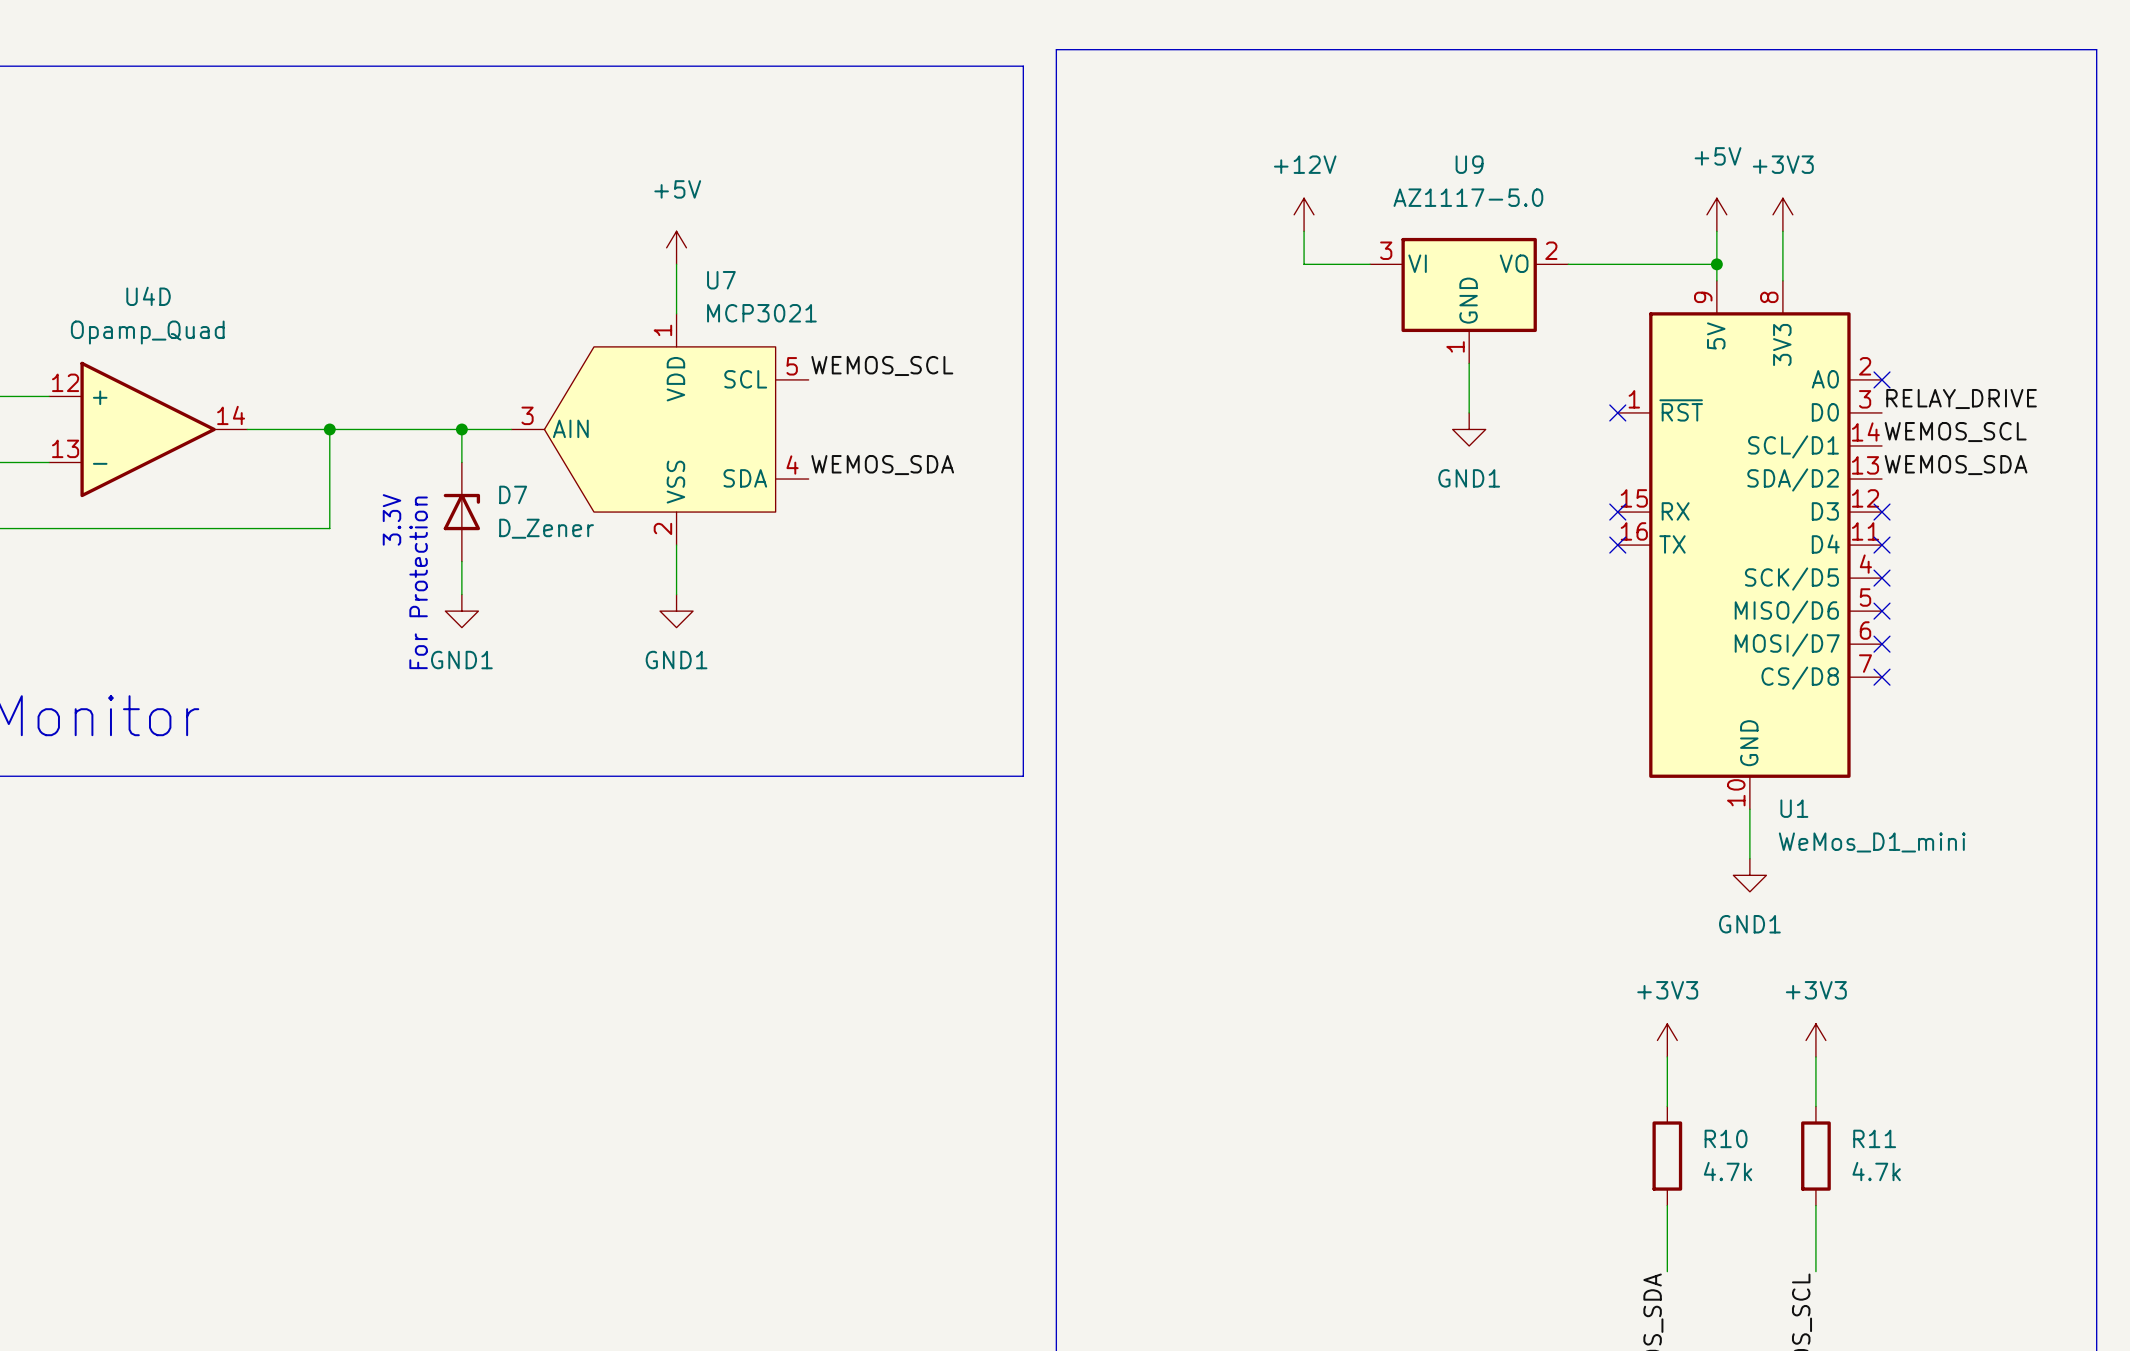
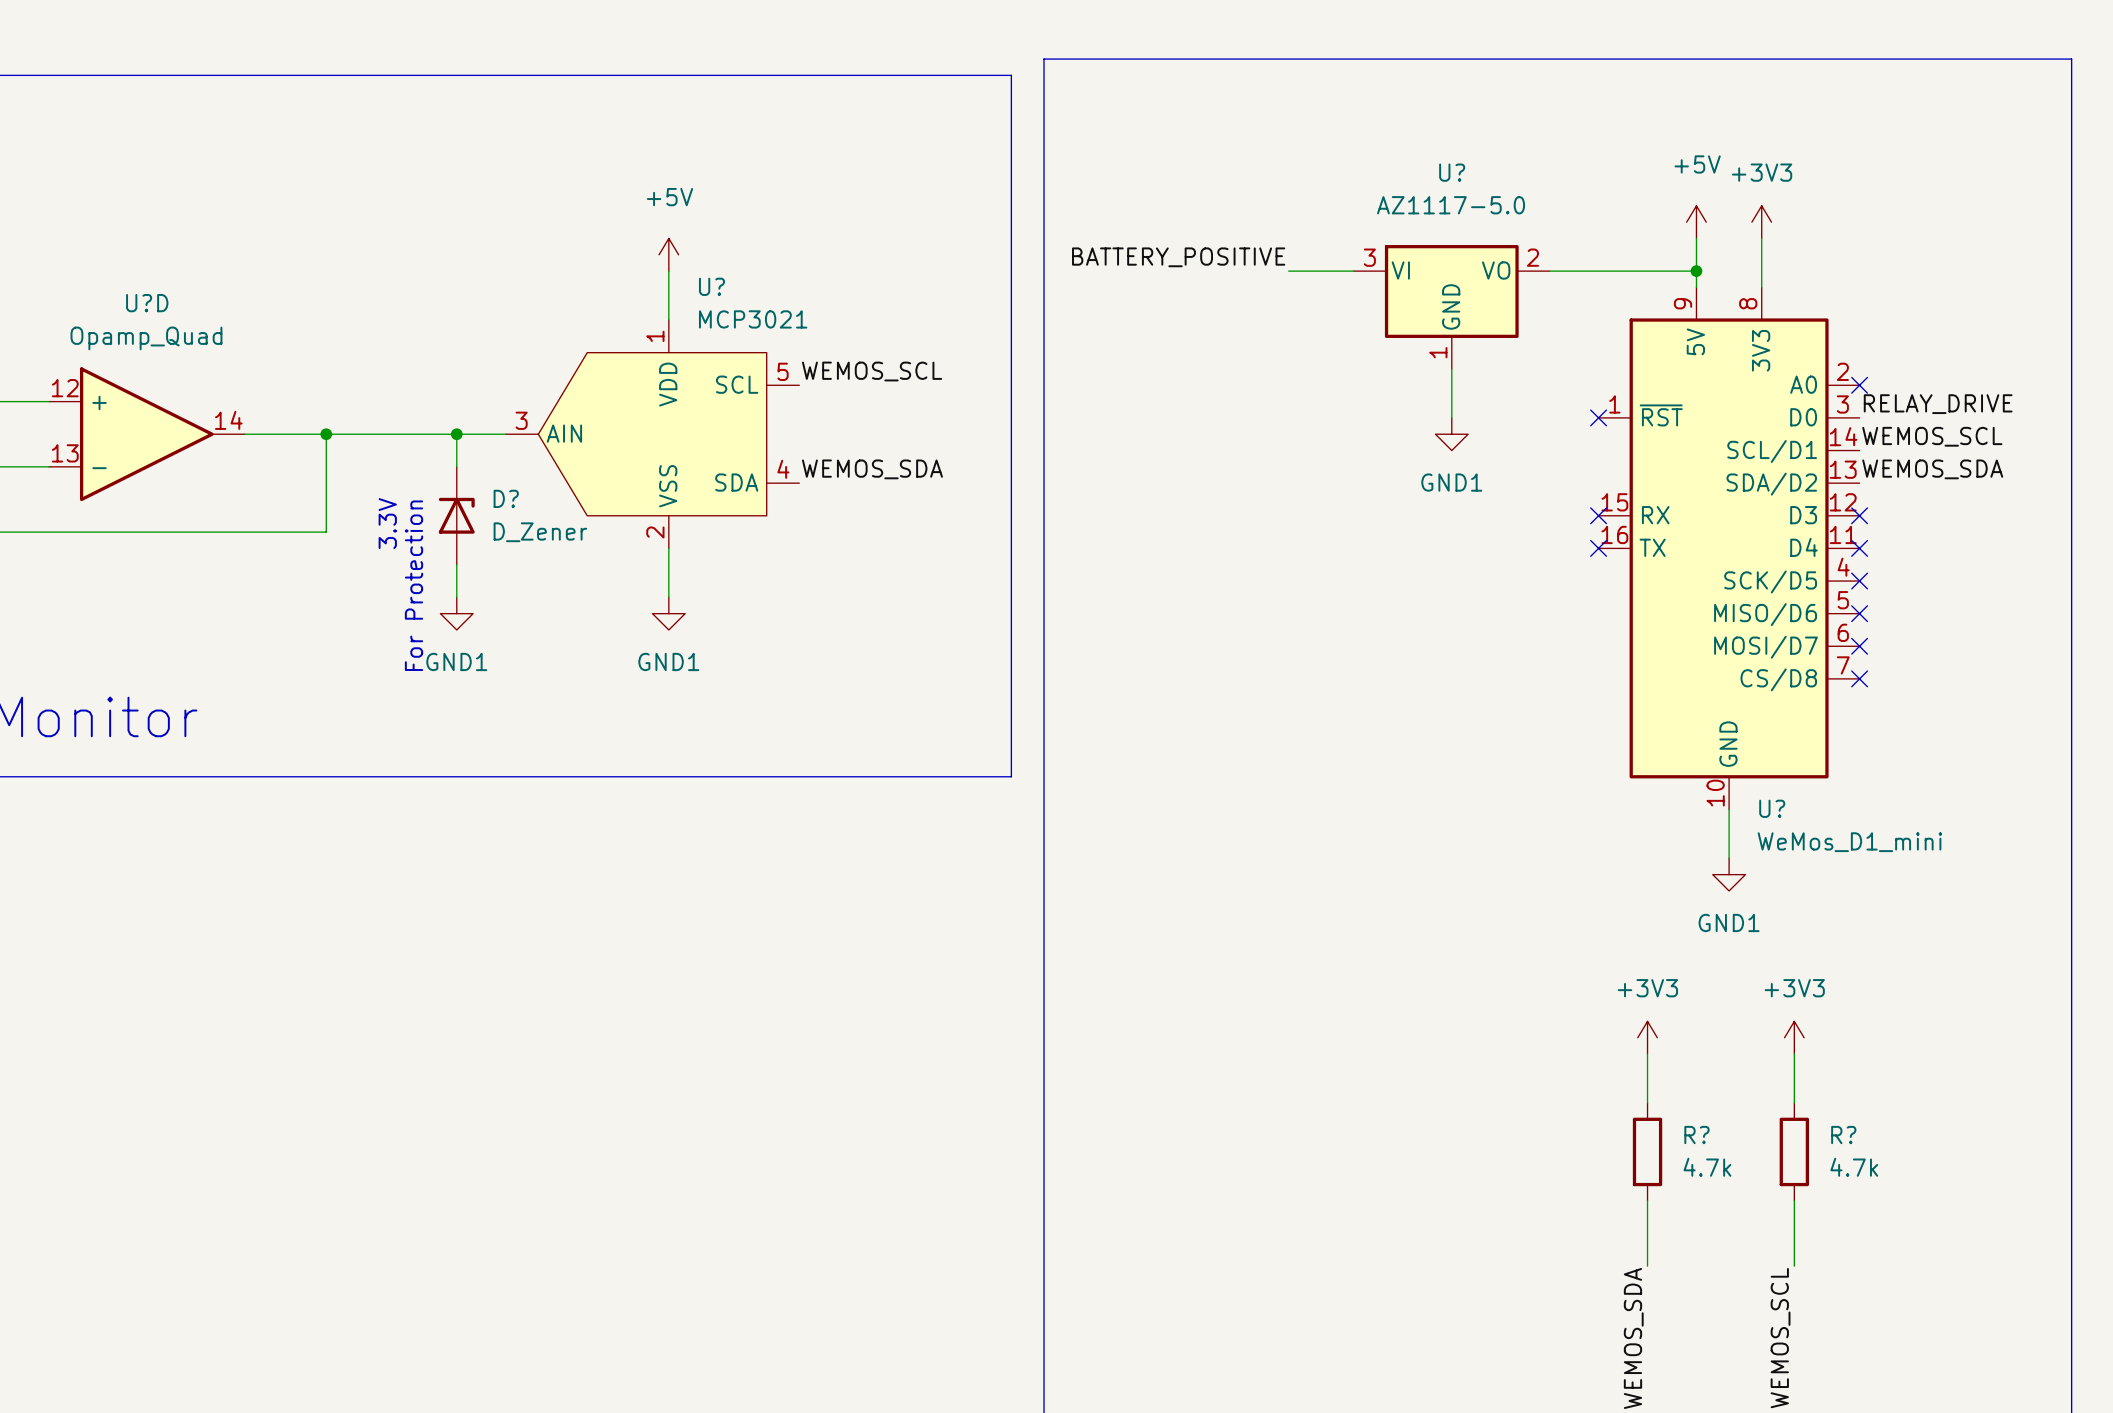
U9 name: U9 (1469, 164) -> U? (1452, 172)
power symbol: +12V (1304, 214) -> none
wire: (1304, 231) (1304, 264) -> none
label: none -> BATTERY_POSITIVE (1178, 257)
U7 name: U7 (721, 280) -> U? (711, 286)
U4D name: U4D (148, 296) -> U?D (147, 303)
D7 name: D7 (513, 494) -> D? (506, 498)
U1 name: U1 (1794, 808) -> U? (1772, 808)
R10 name: R10 (1726, 1138) -> R? (1696, 1135)
R11 name: R11 (1874, 1138) -> R? (1843, 1135)

